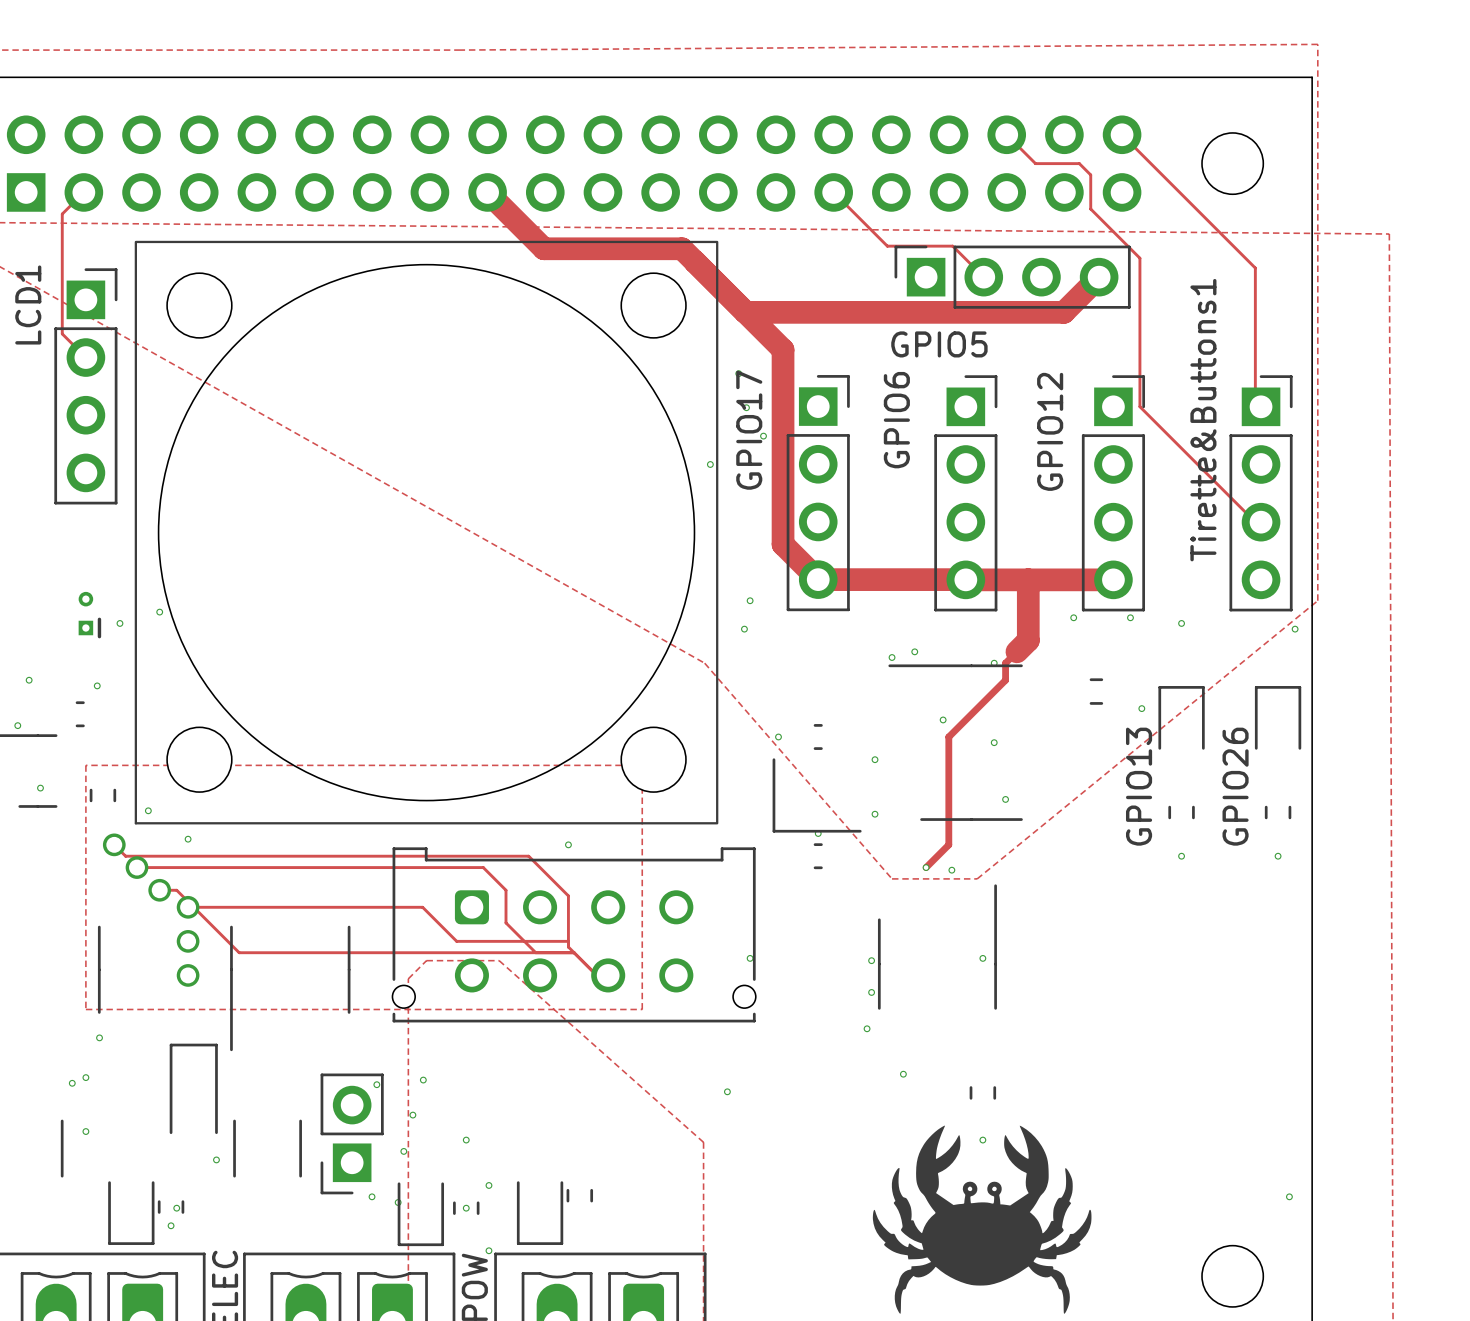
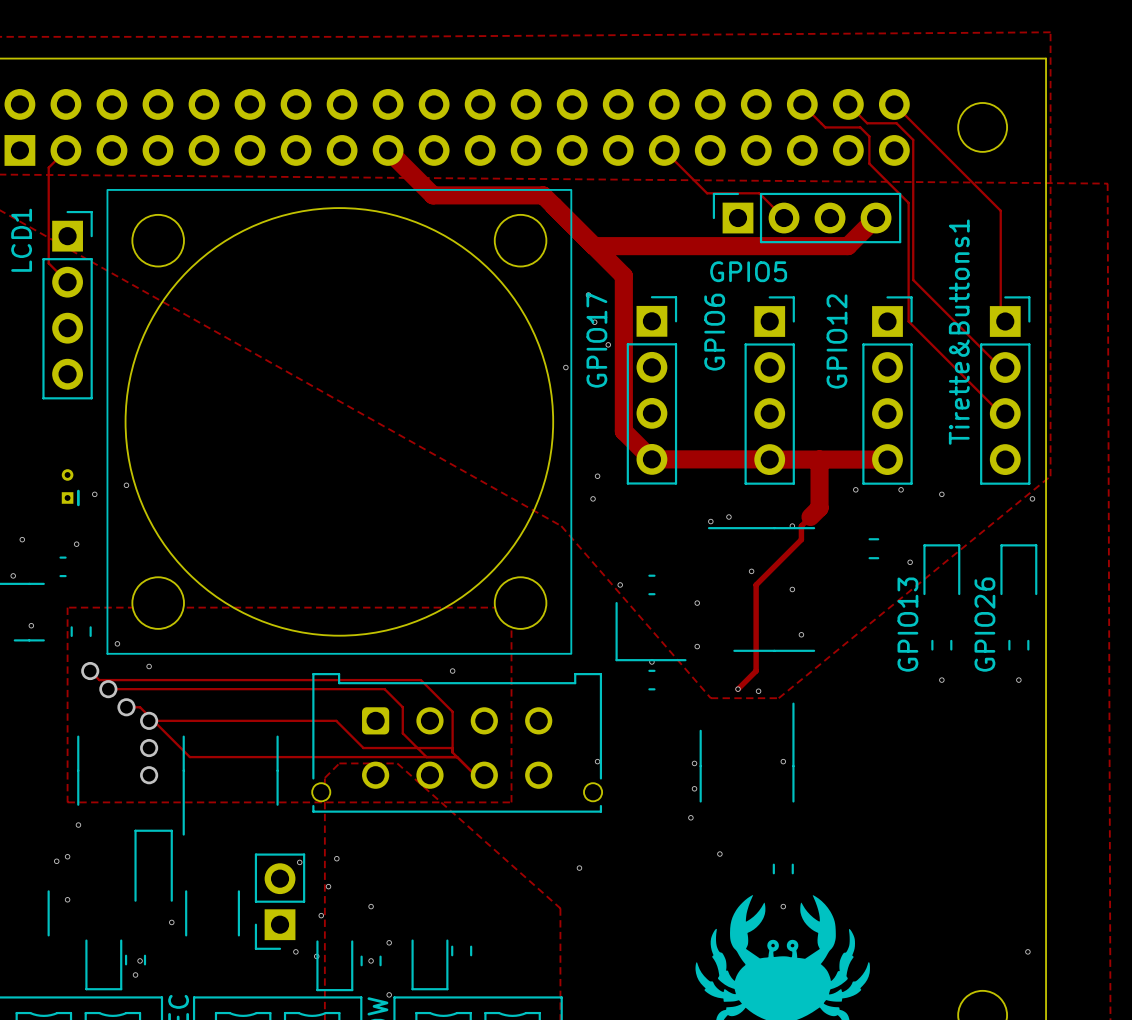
track: none -> (848, 104) (867, 123) (896, 123) (913, 139) (913, 280) (1000, 367)

